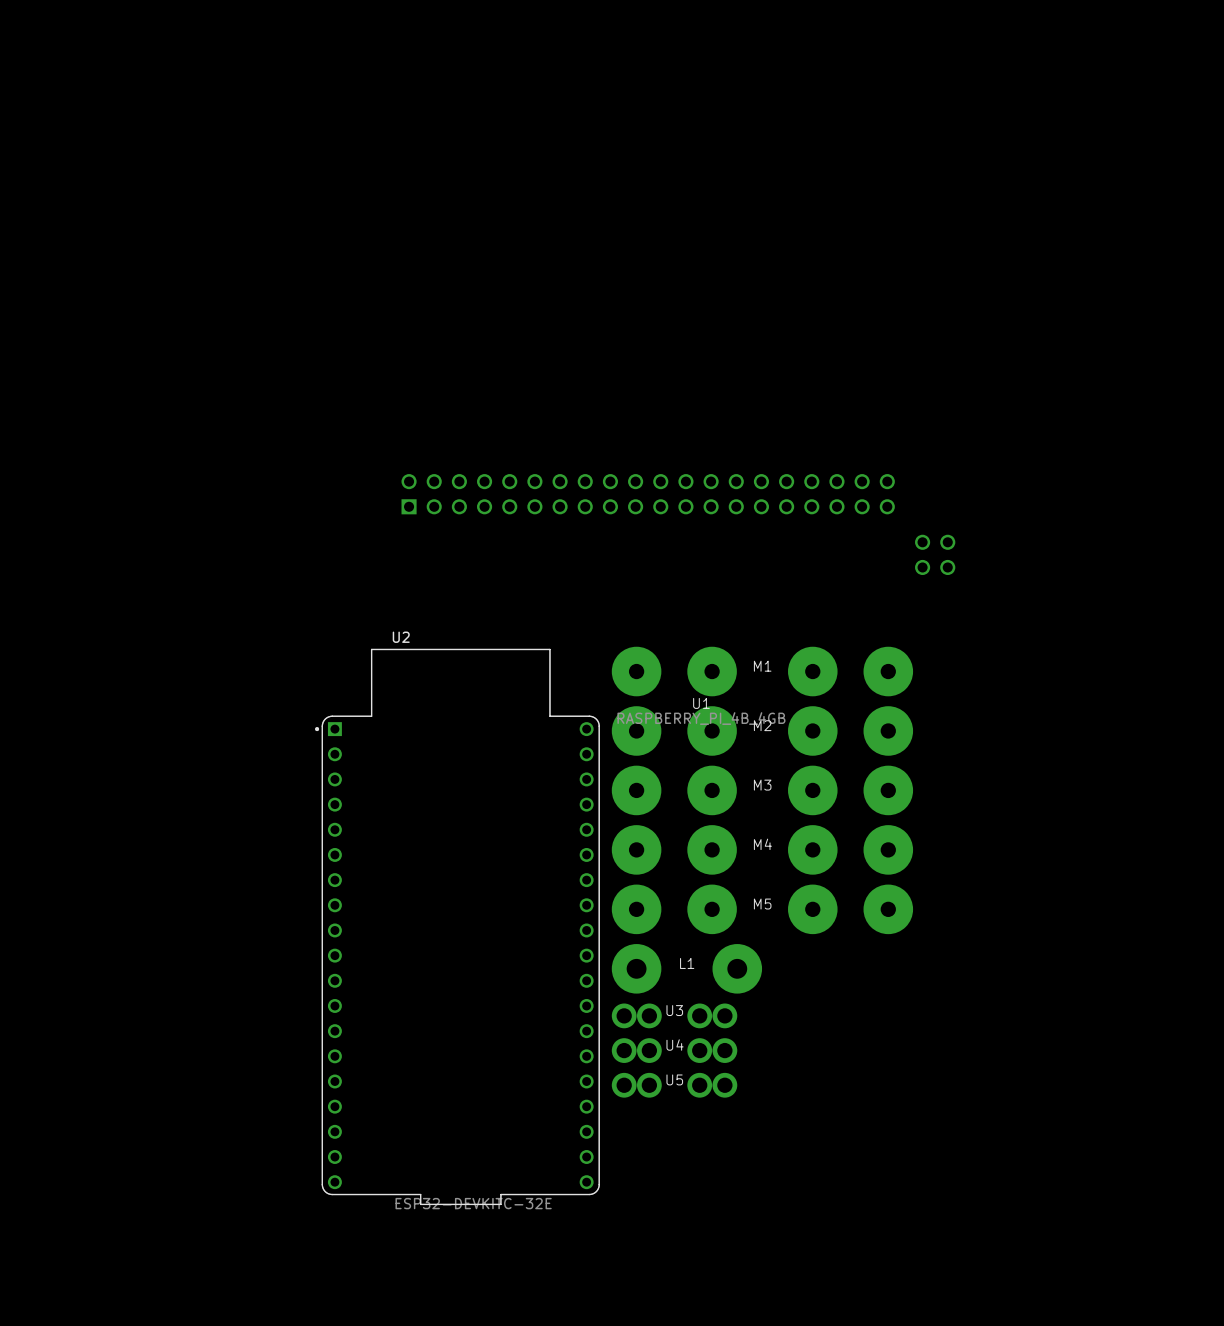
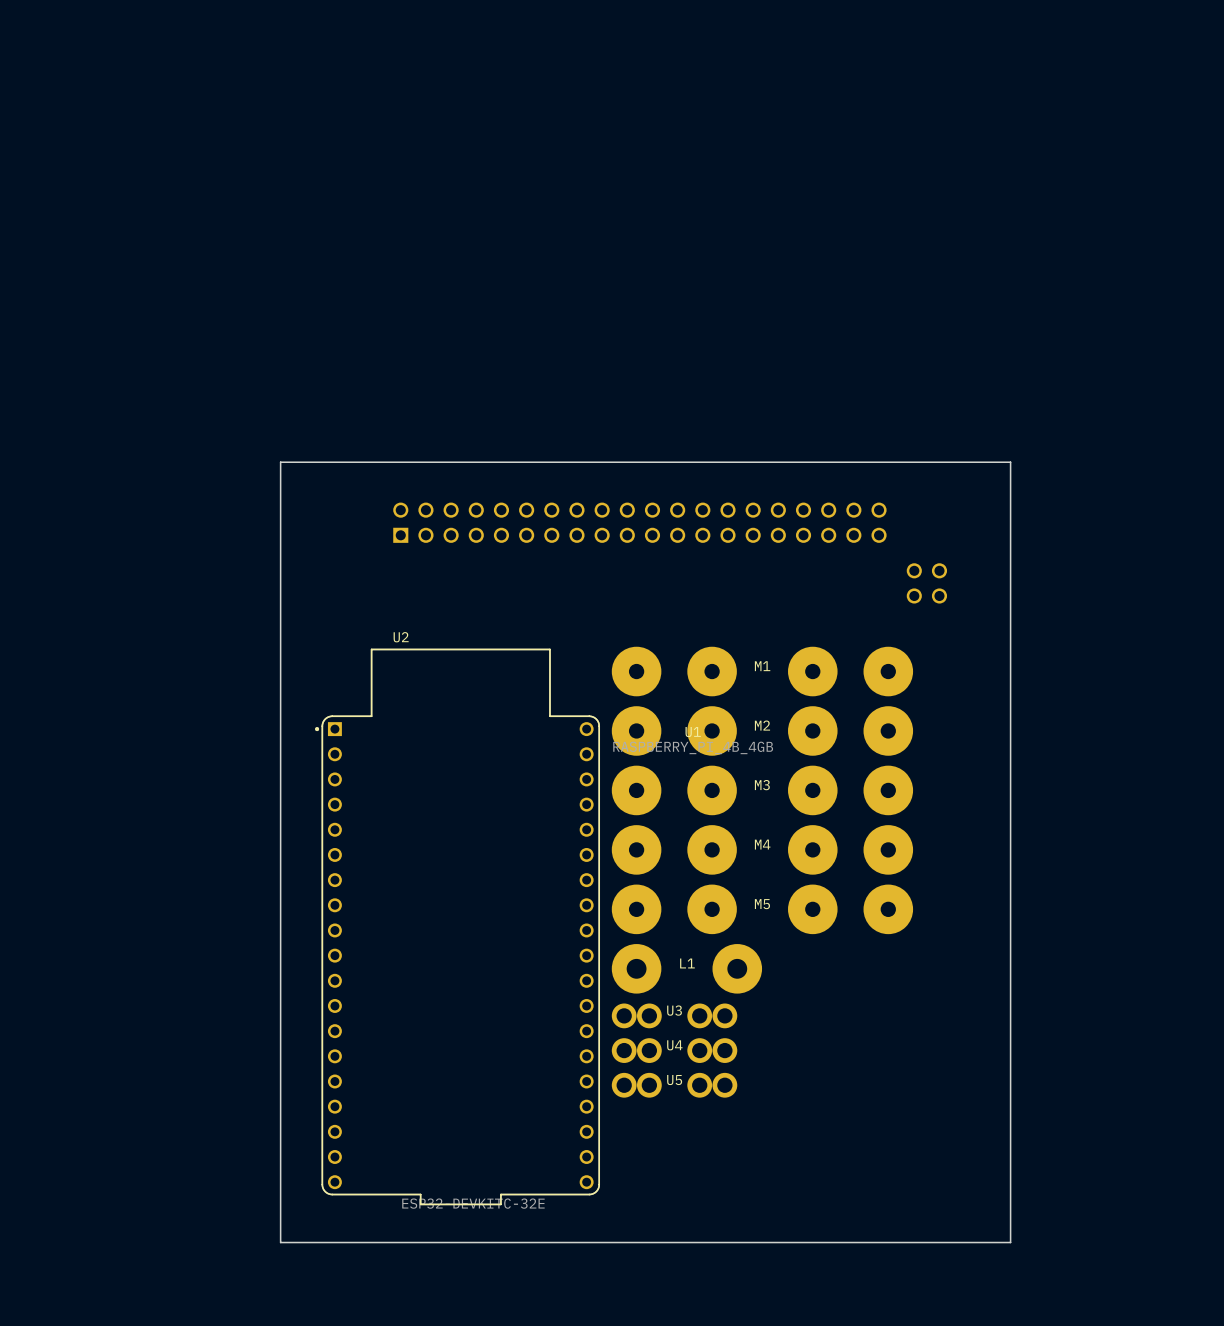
board edge: none -> (280, 462) (280, 1242) (1010, 1242) (1010, 462) (280, 462)
U1 position: (678, 524) -> (670, 553)

